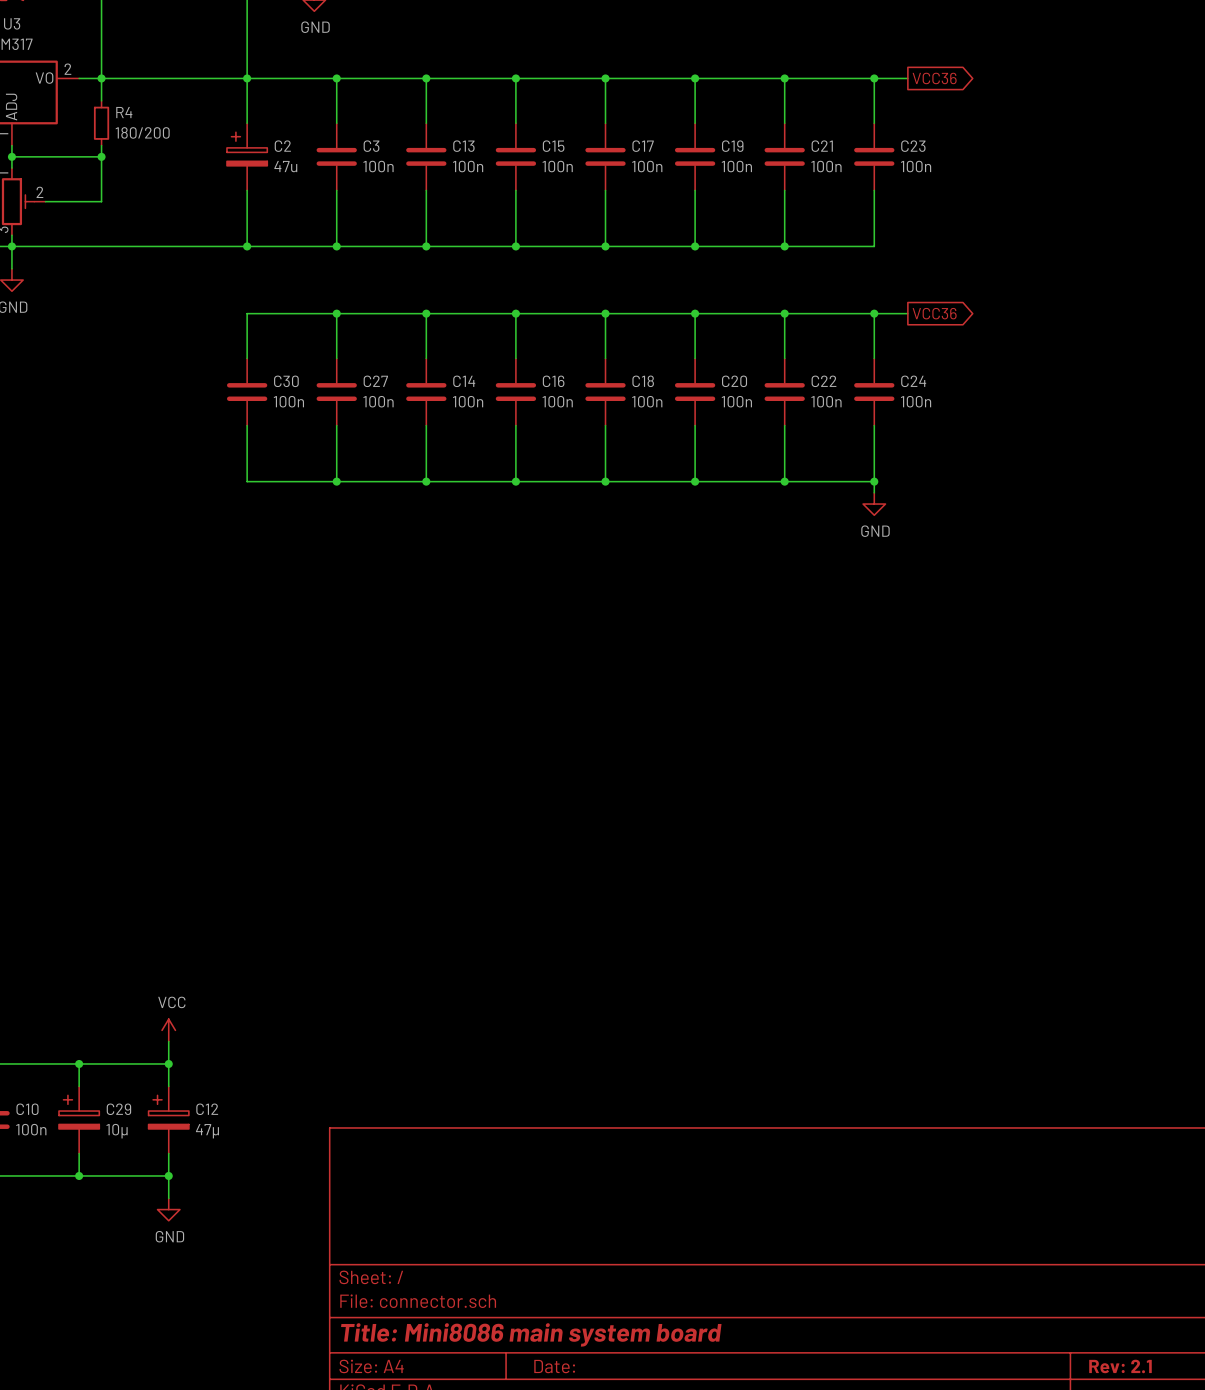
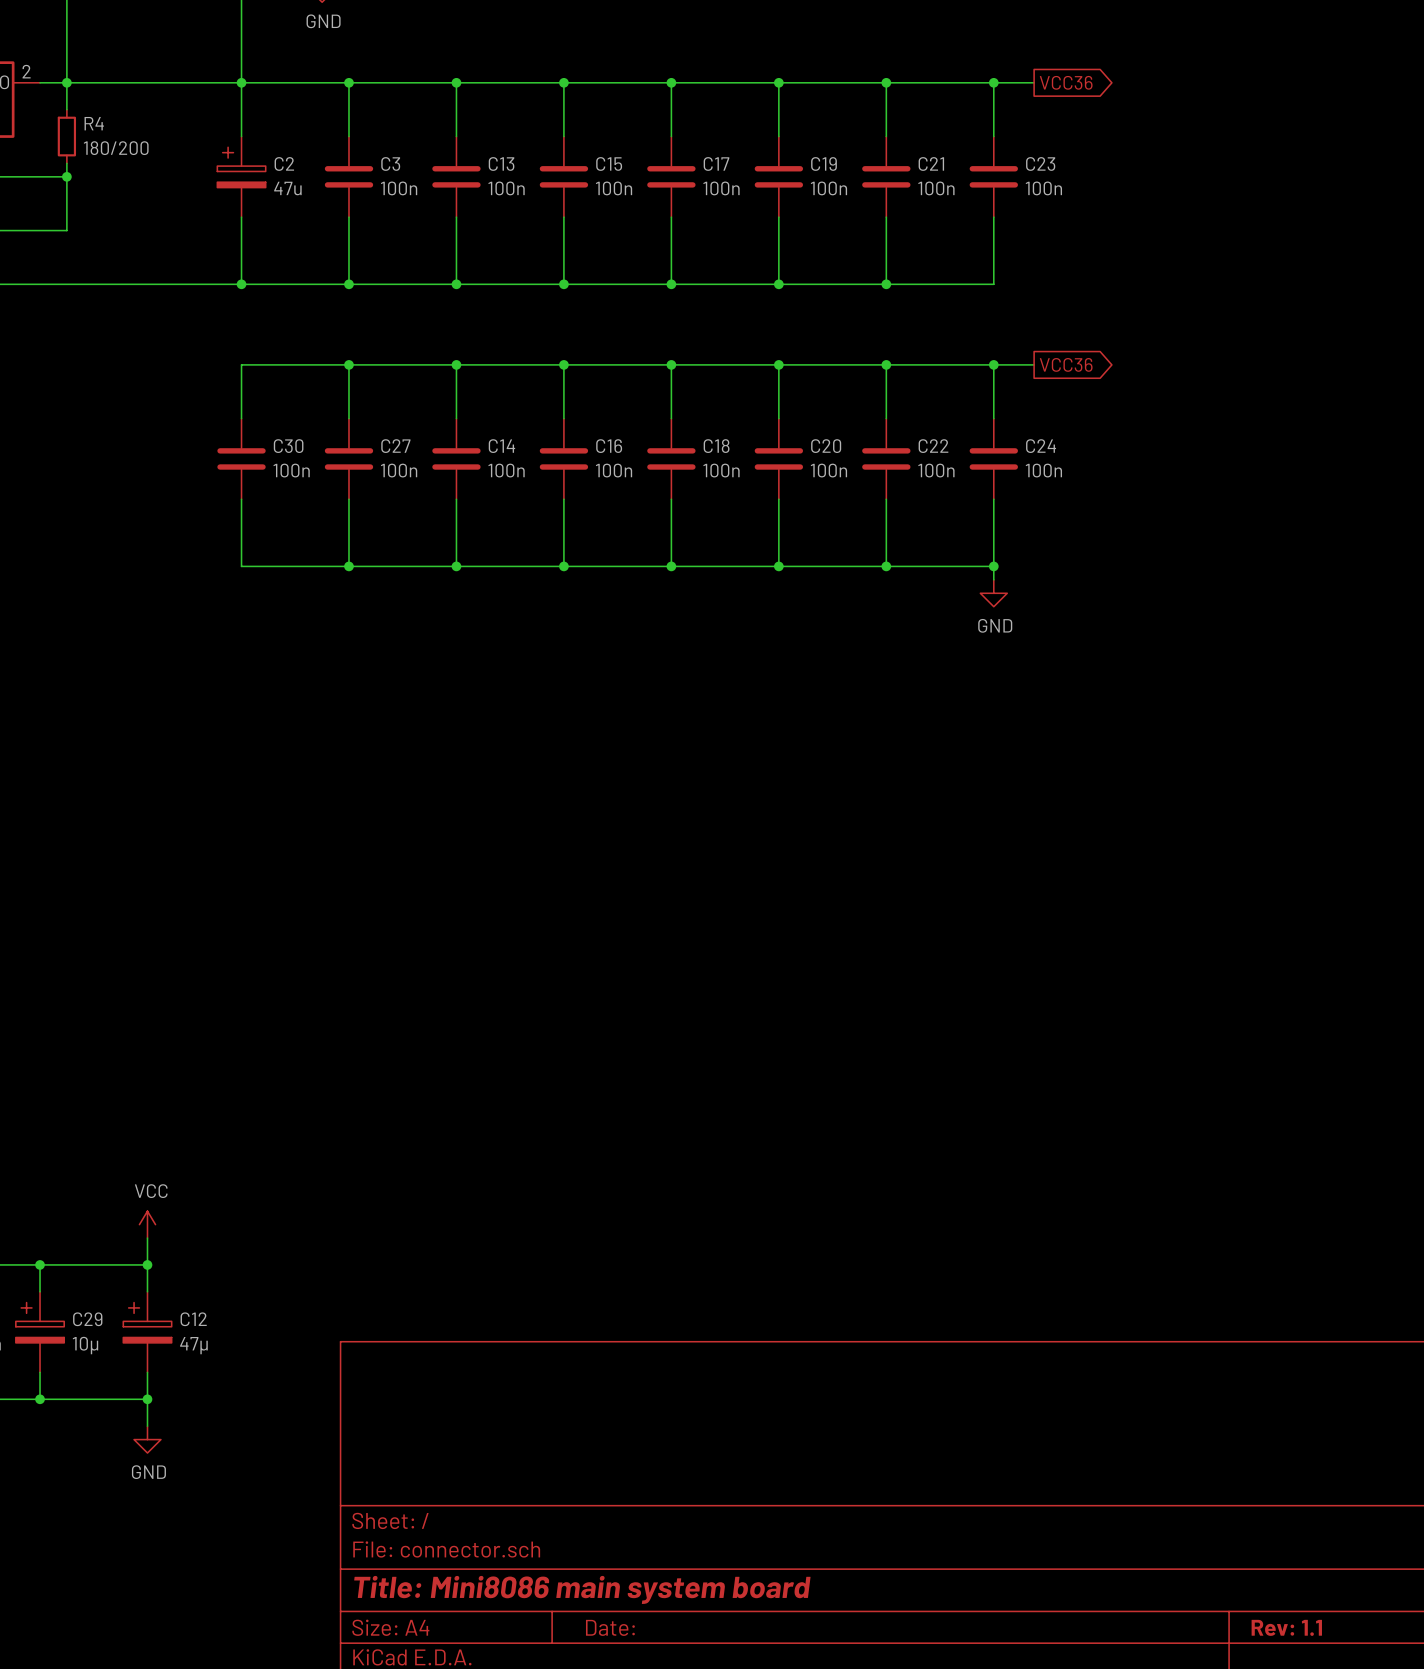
title block: Rev: 2.1 (1120, 1366) -> Rev: 1.1 (1286, 1627)

